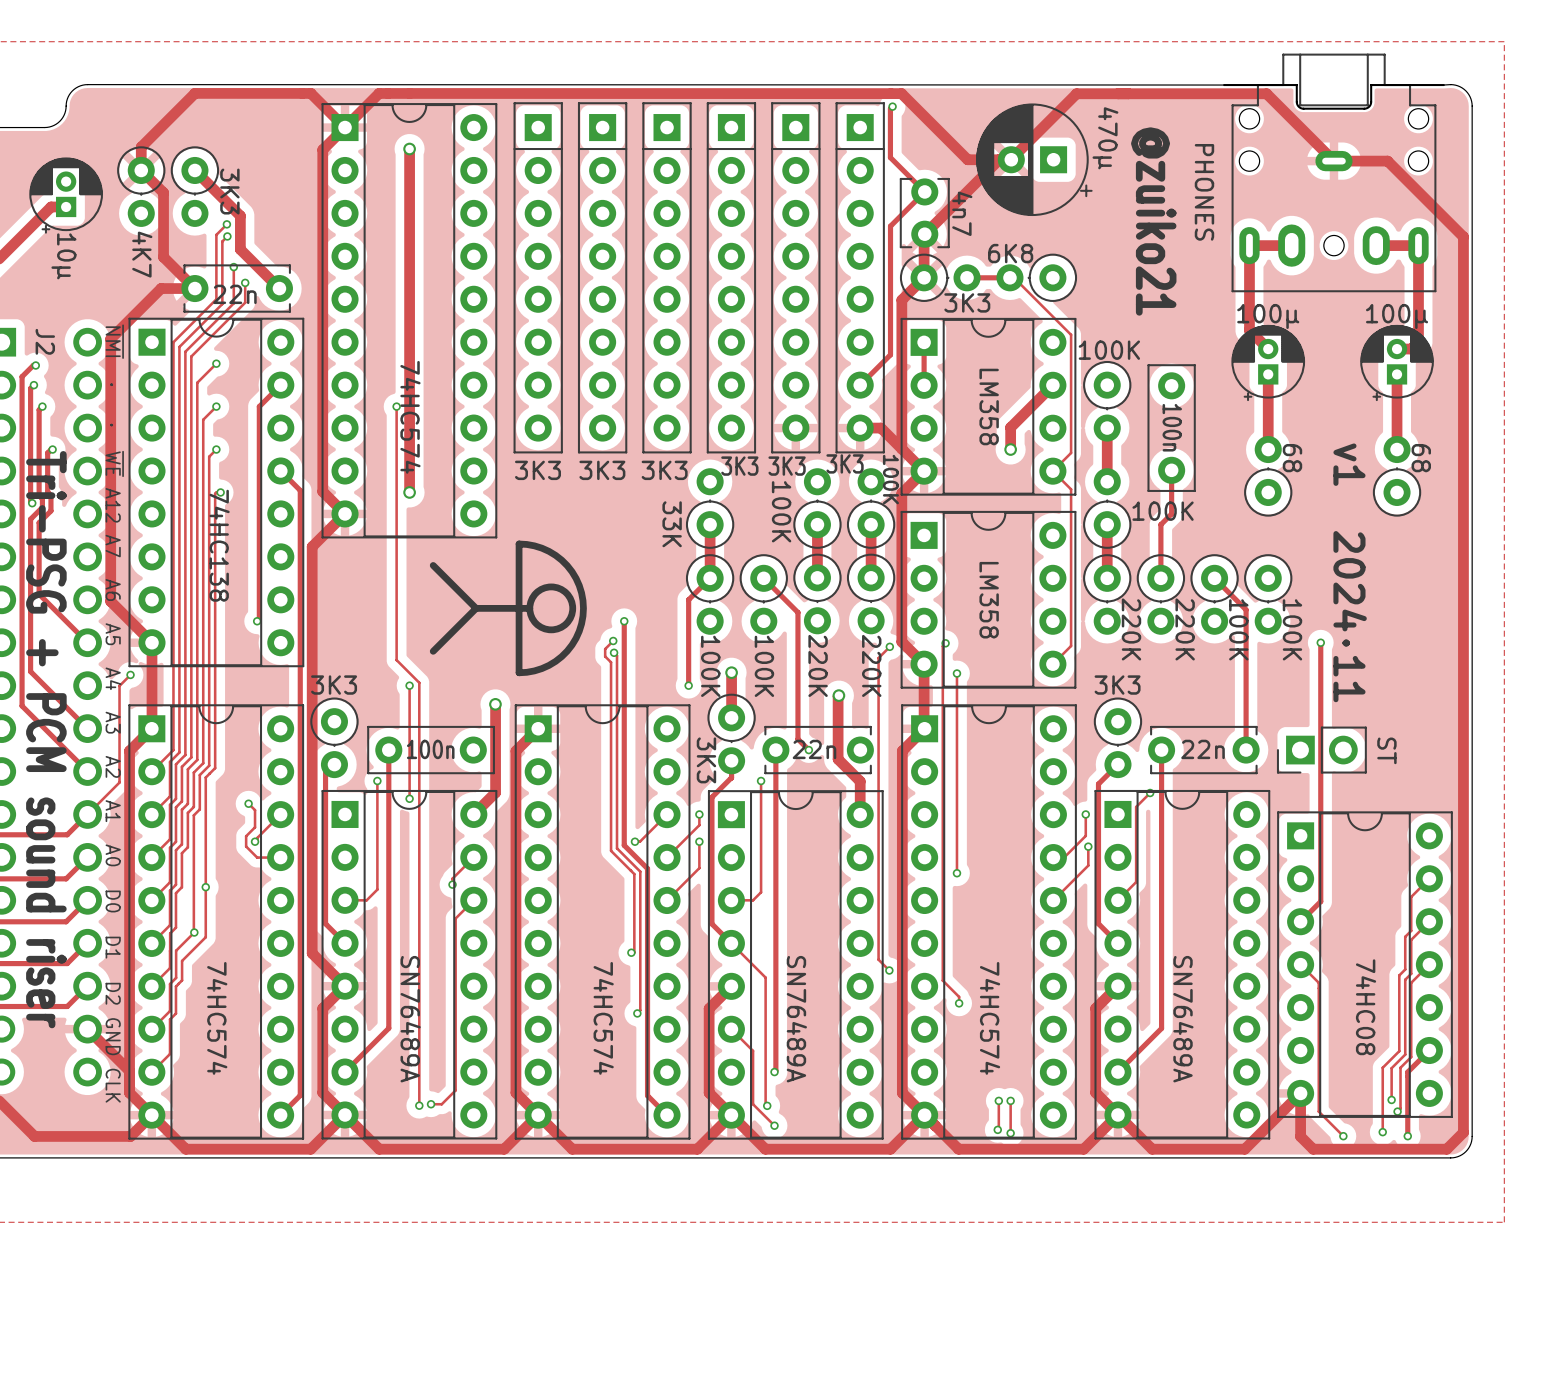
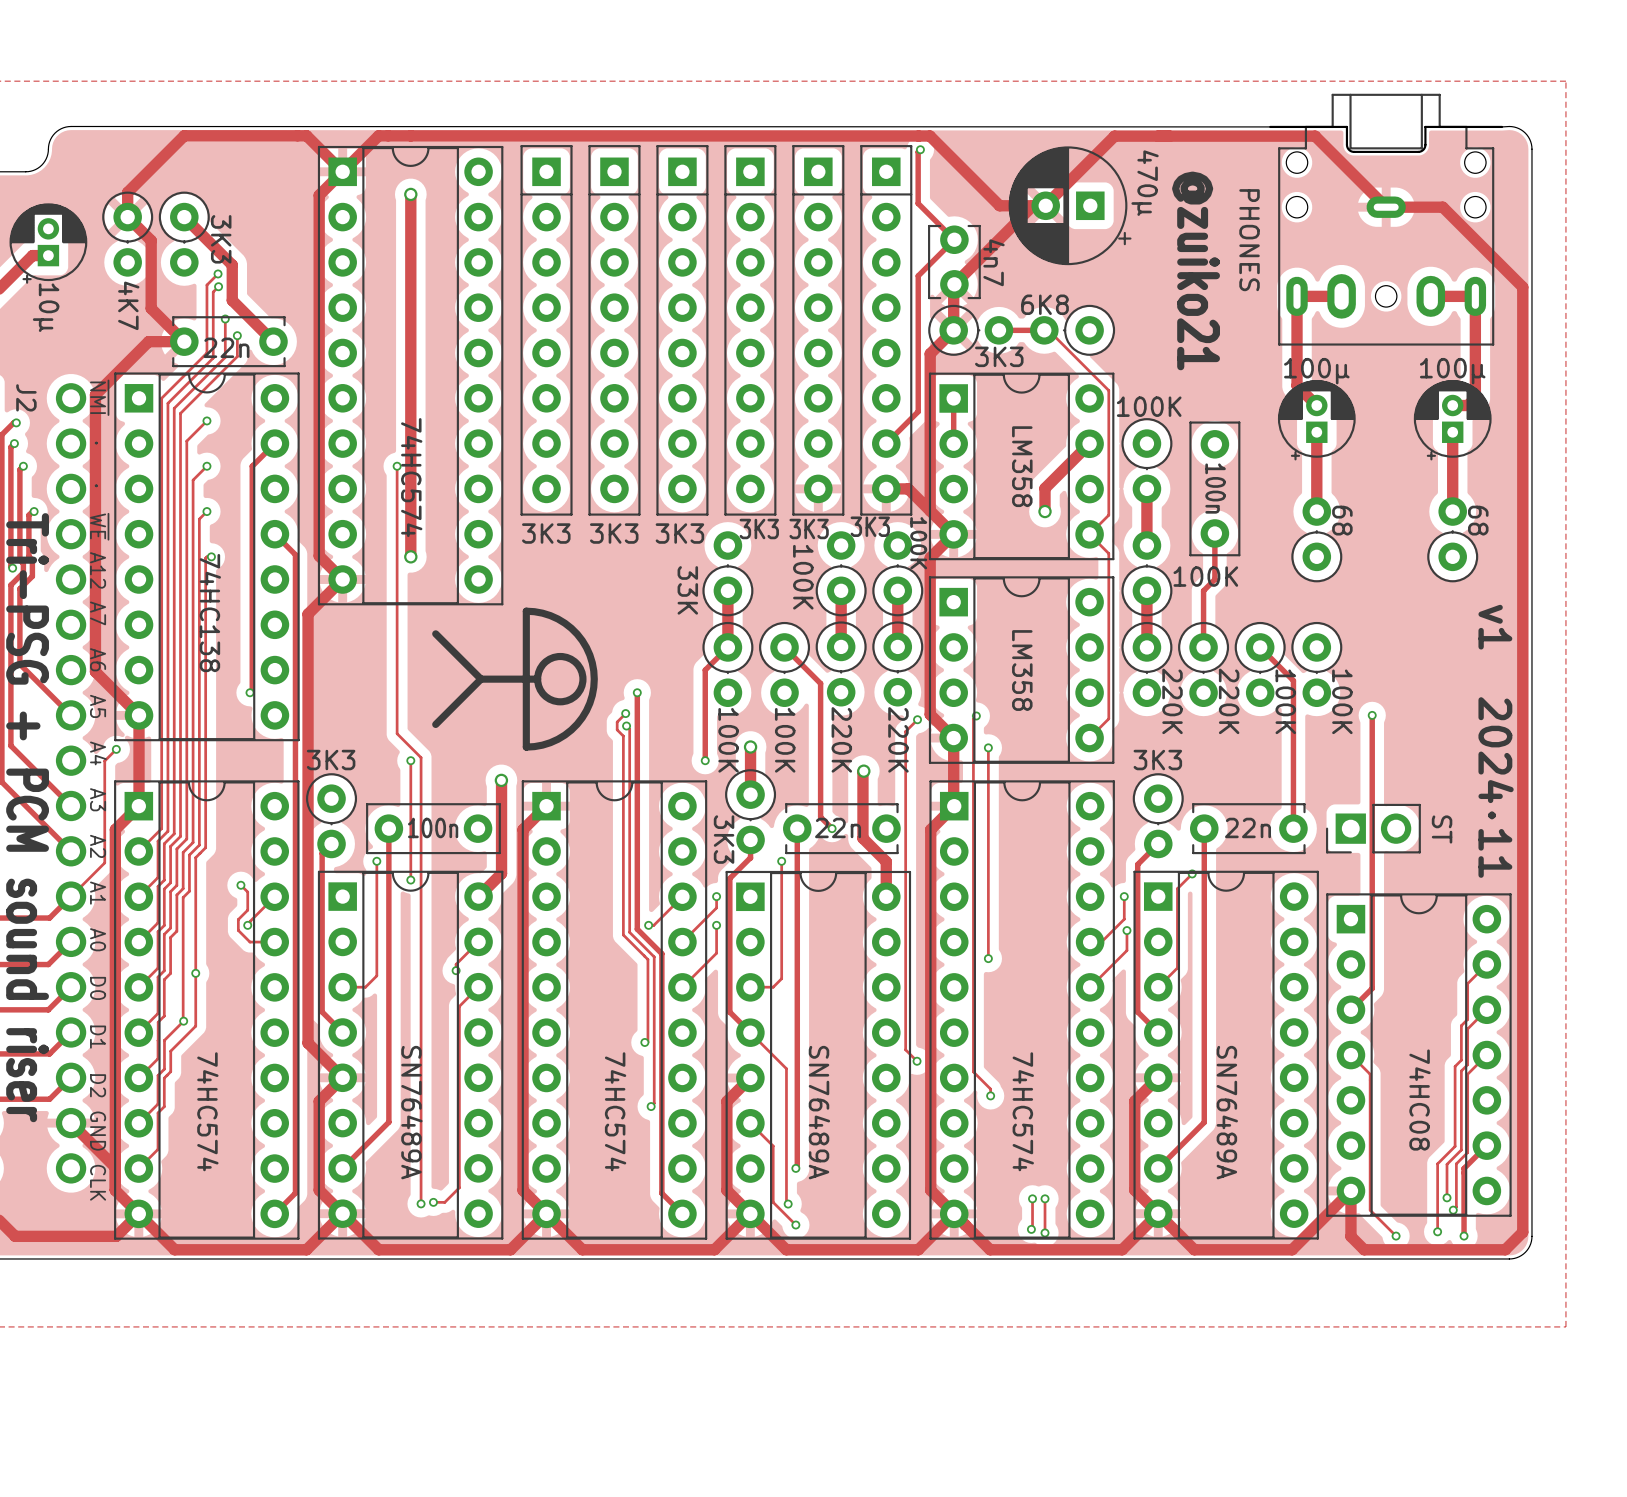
text position: v1 2024·11 (1350, 572) -> v1 2024·11 (1496, 741)

